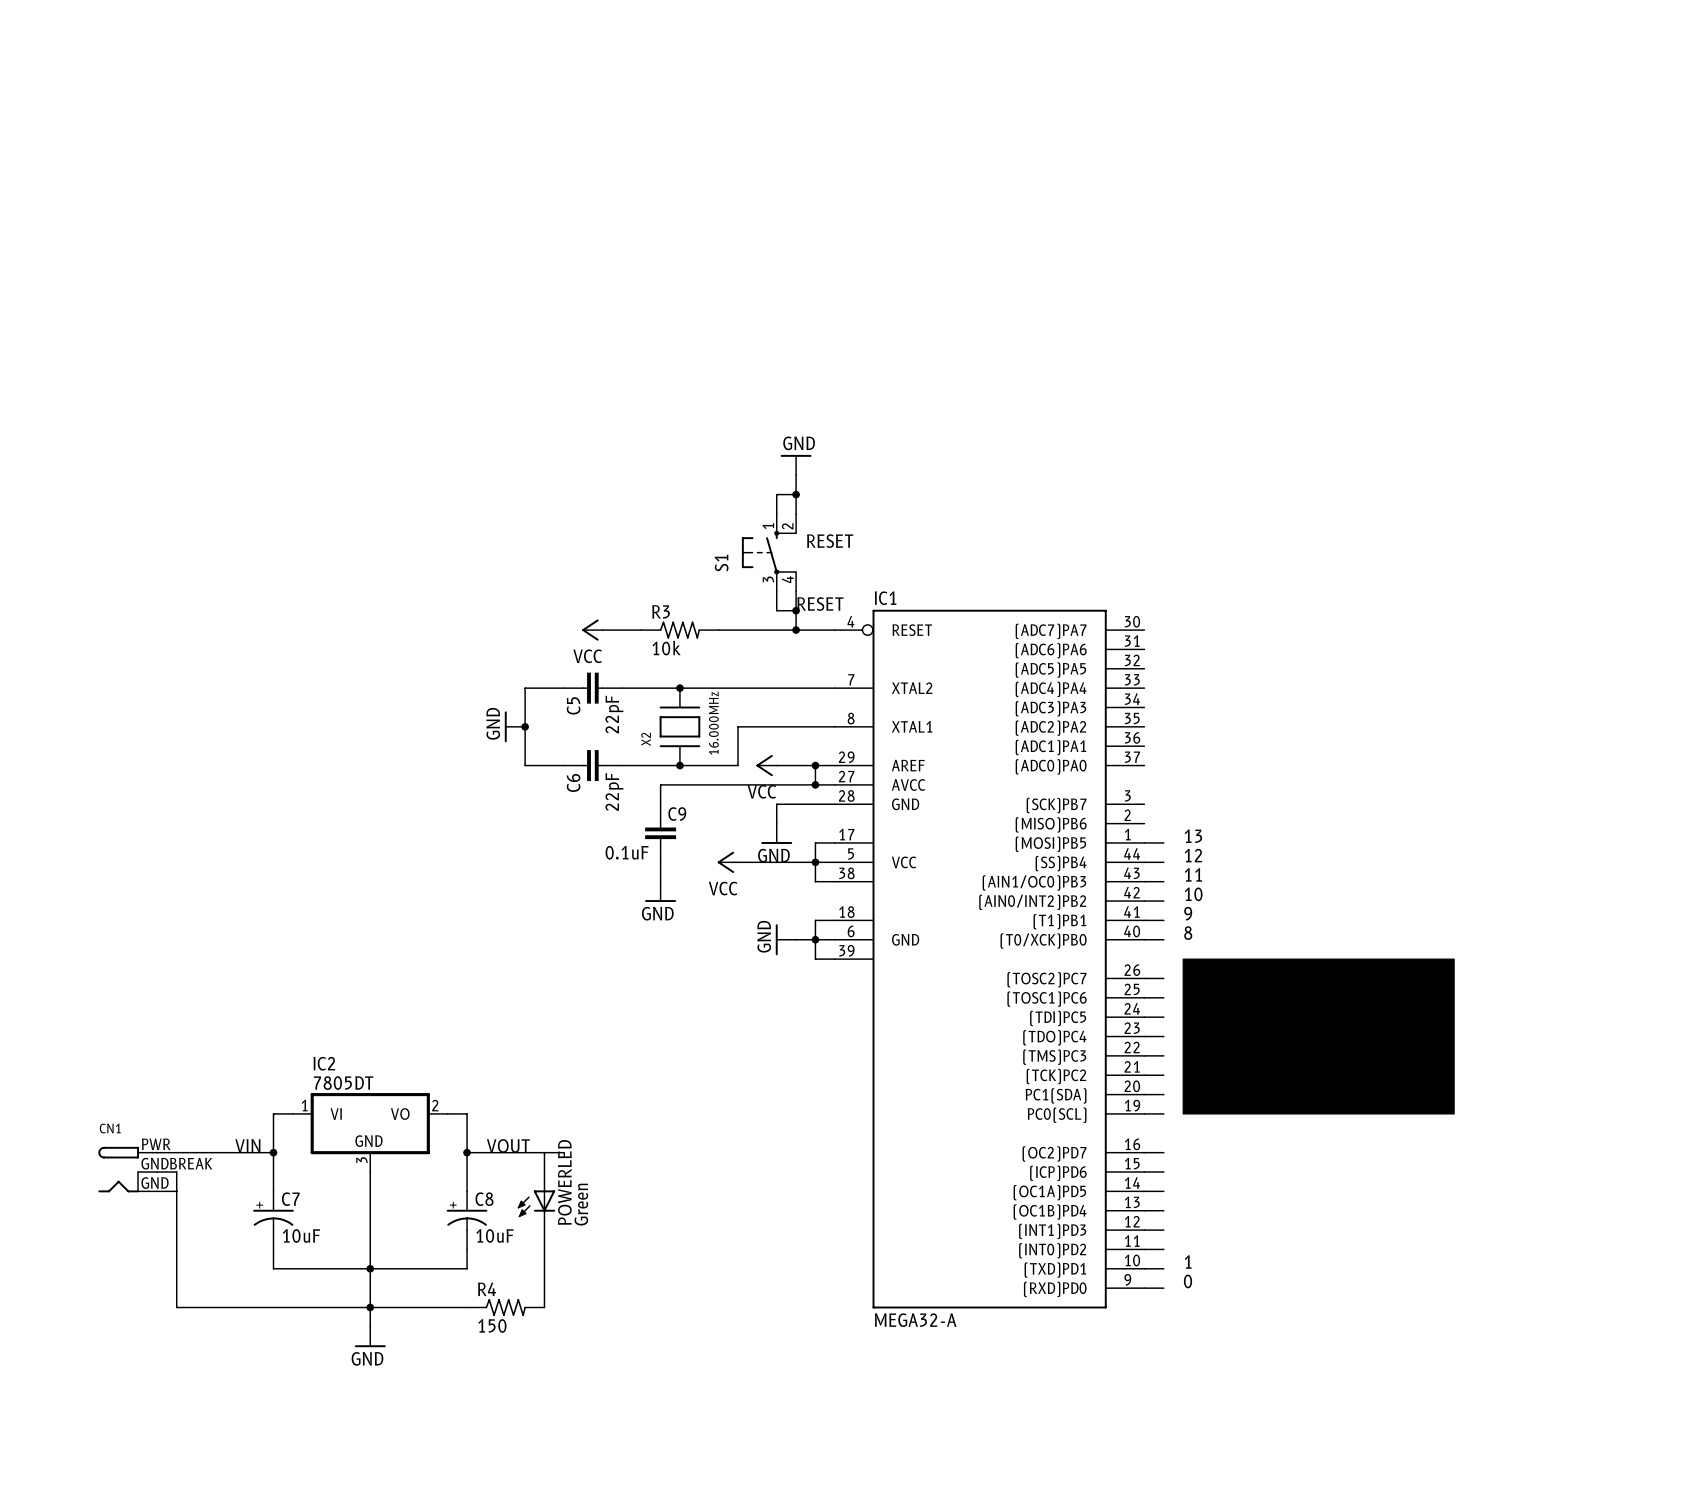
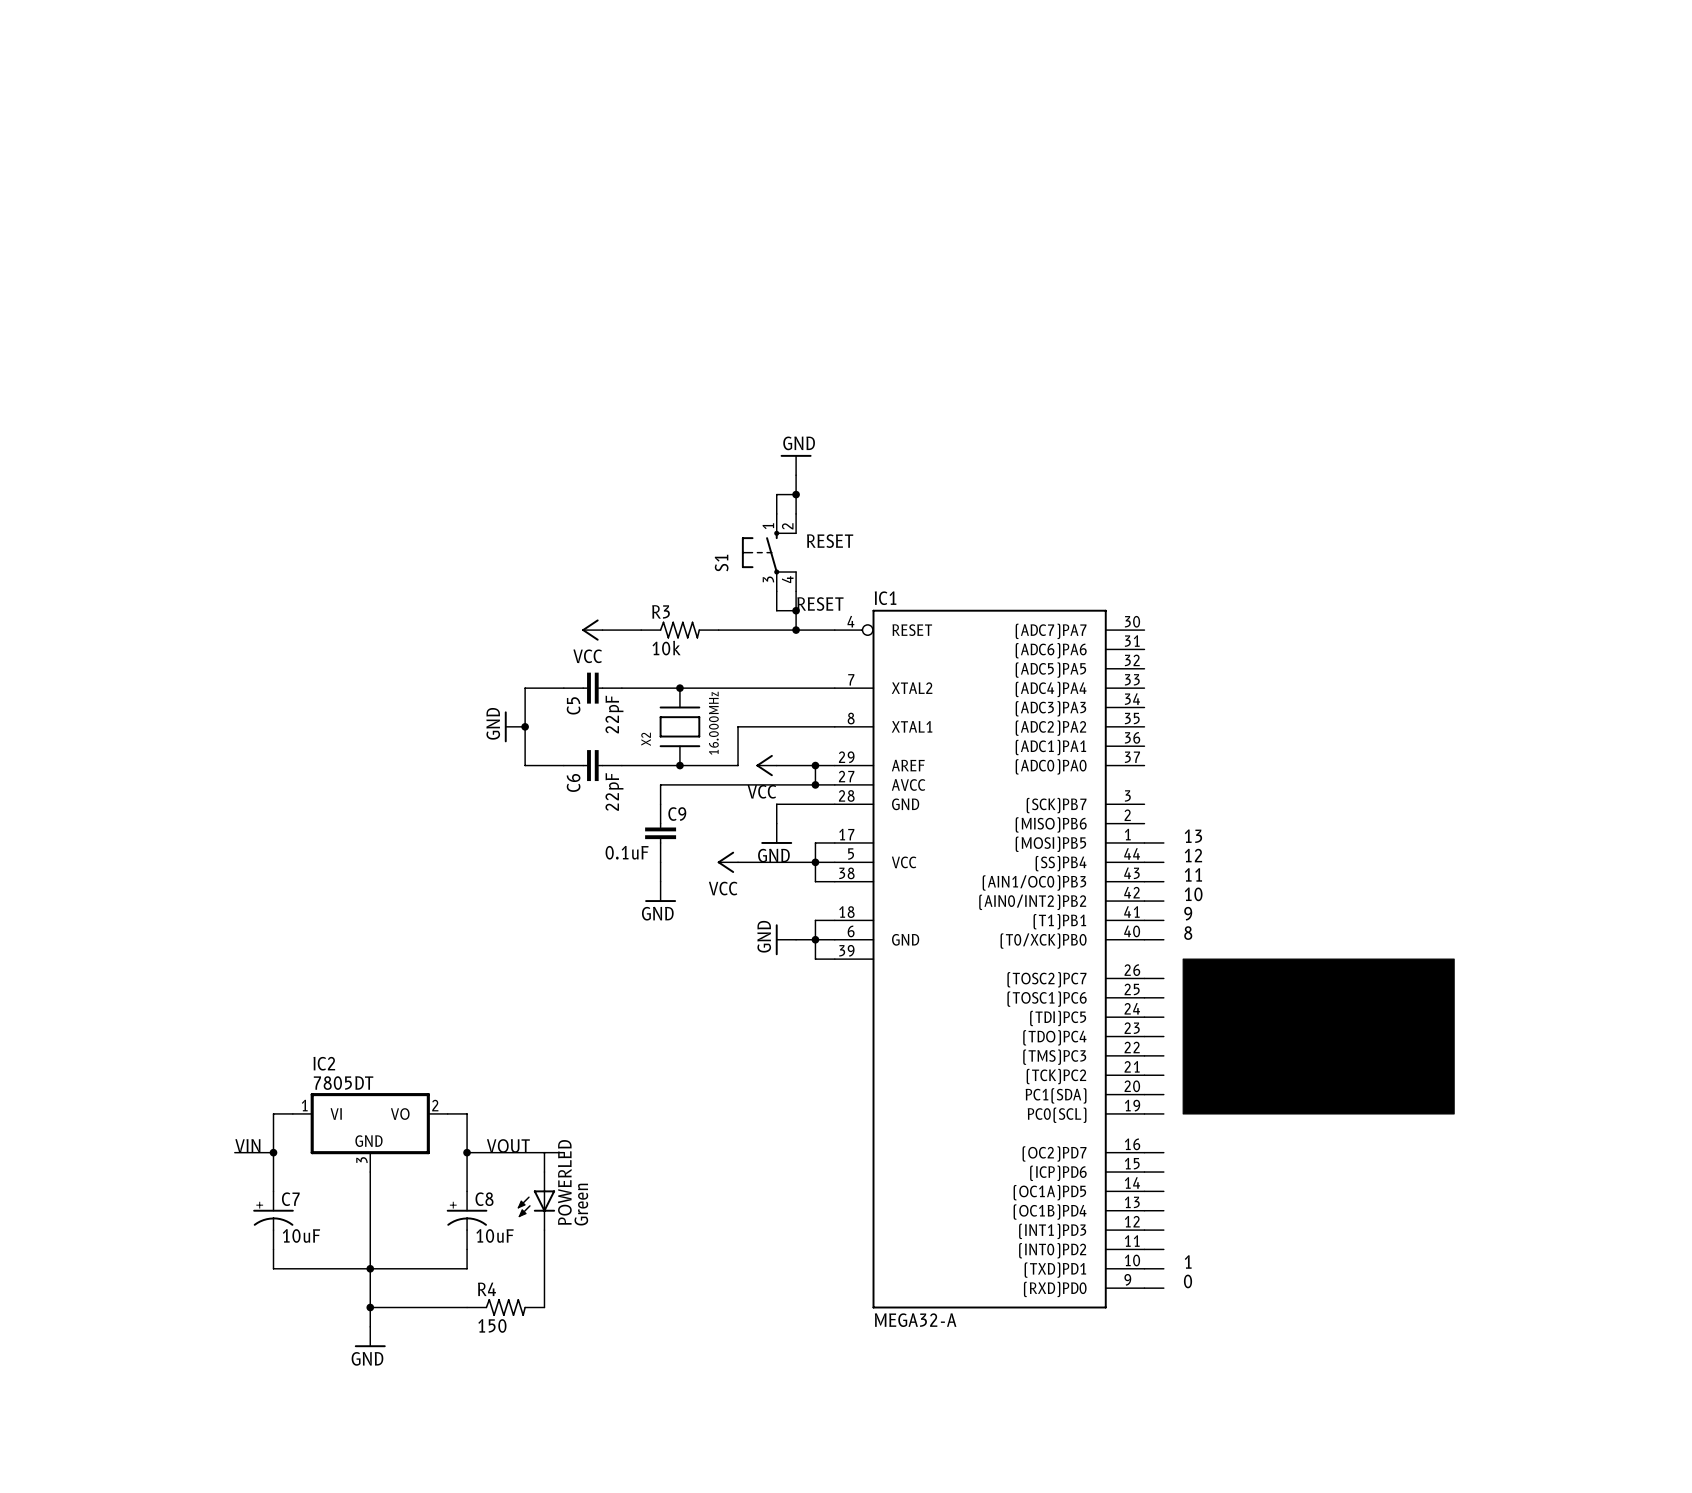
wire: (157, 1152) (234, 1152) -> none
CN1: (127, 1169) -> none
wire: (157, 1172) (176, 1172) (176, 1307) (370, 1307) -> none
wire: (157, 1191) (176, 1191) -> none

